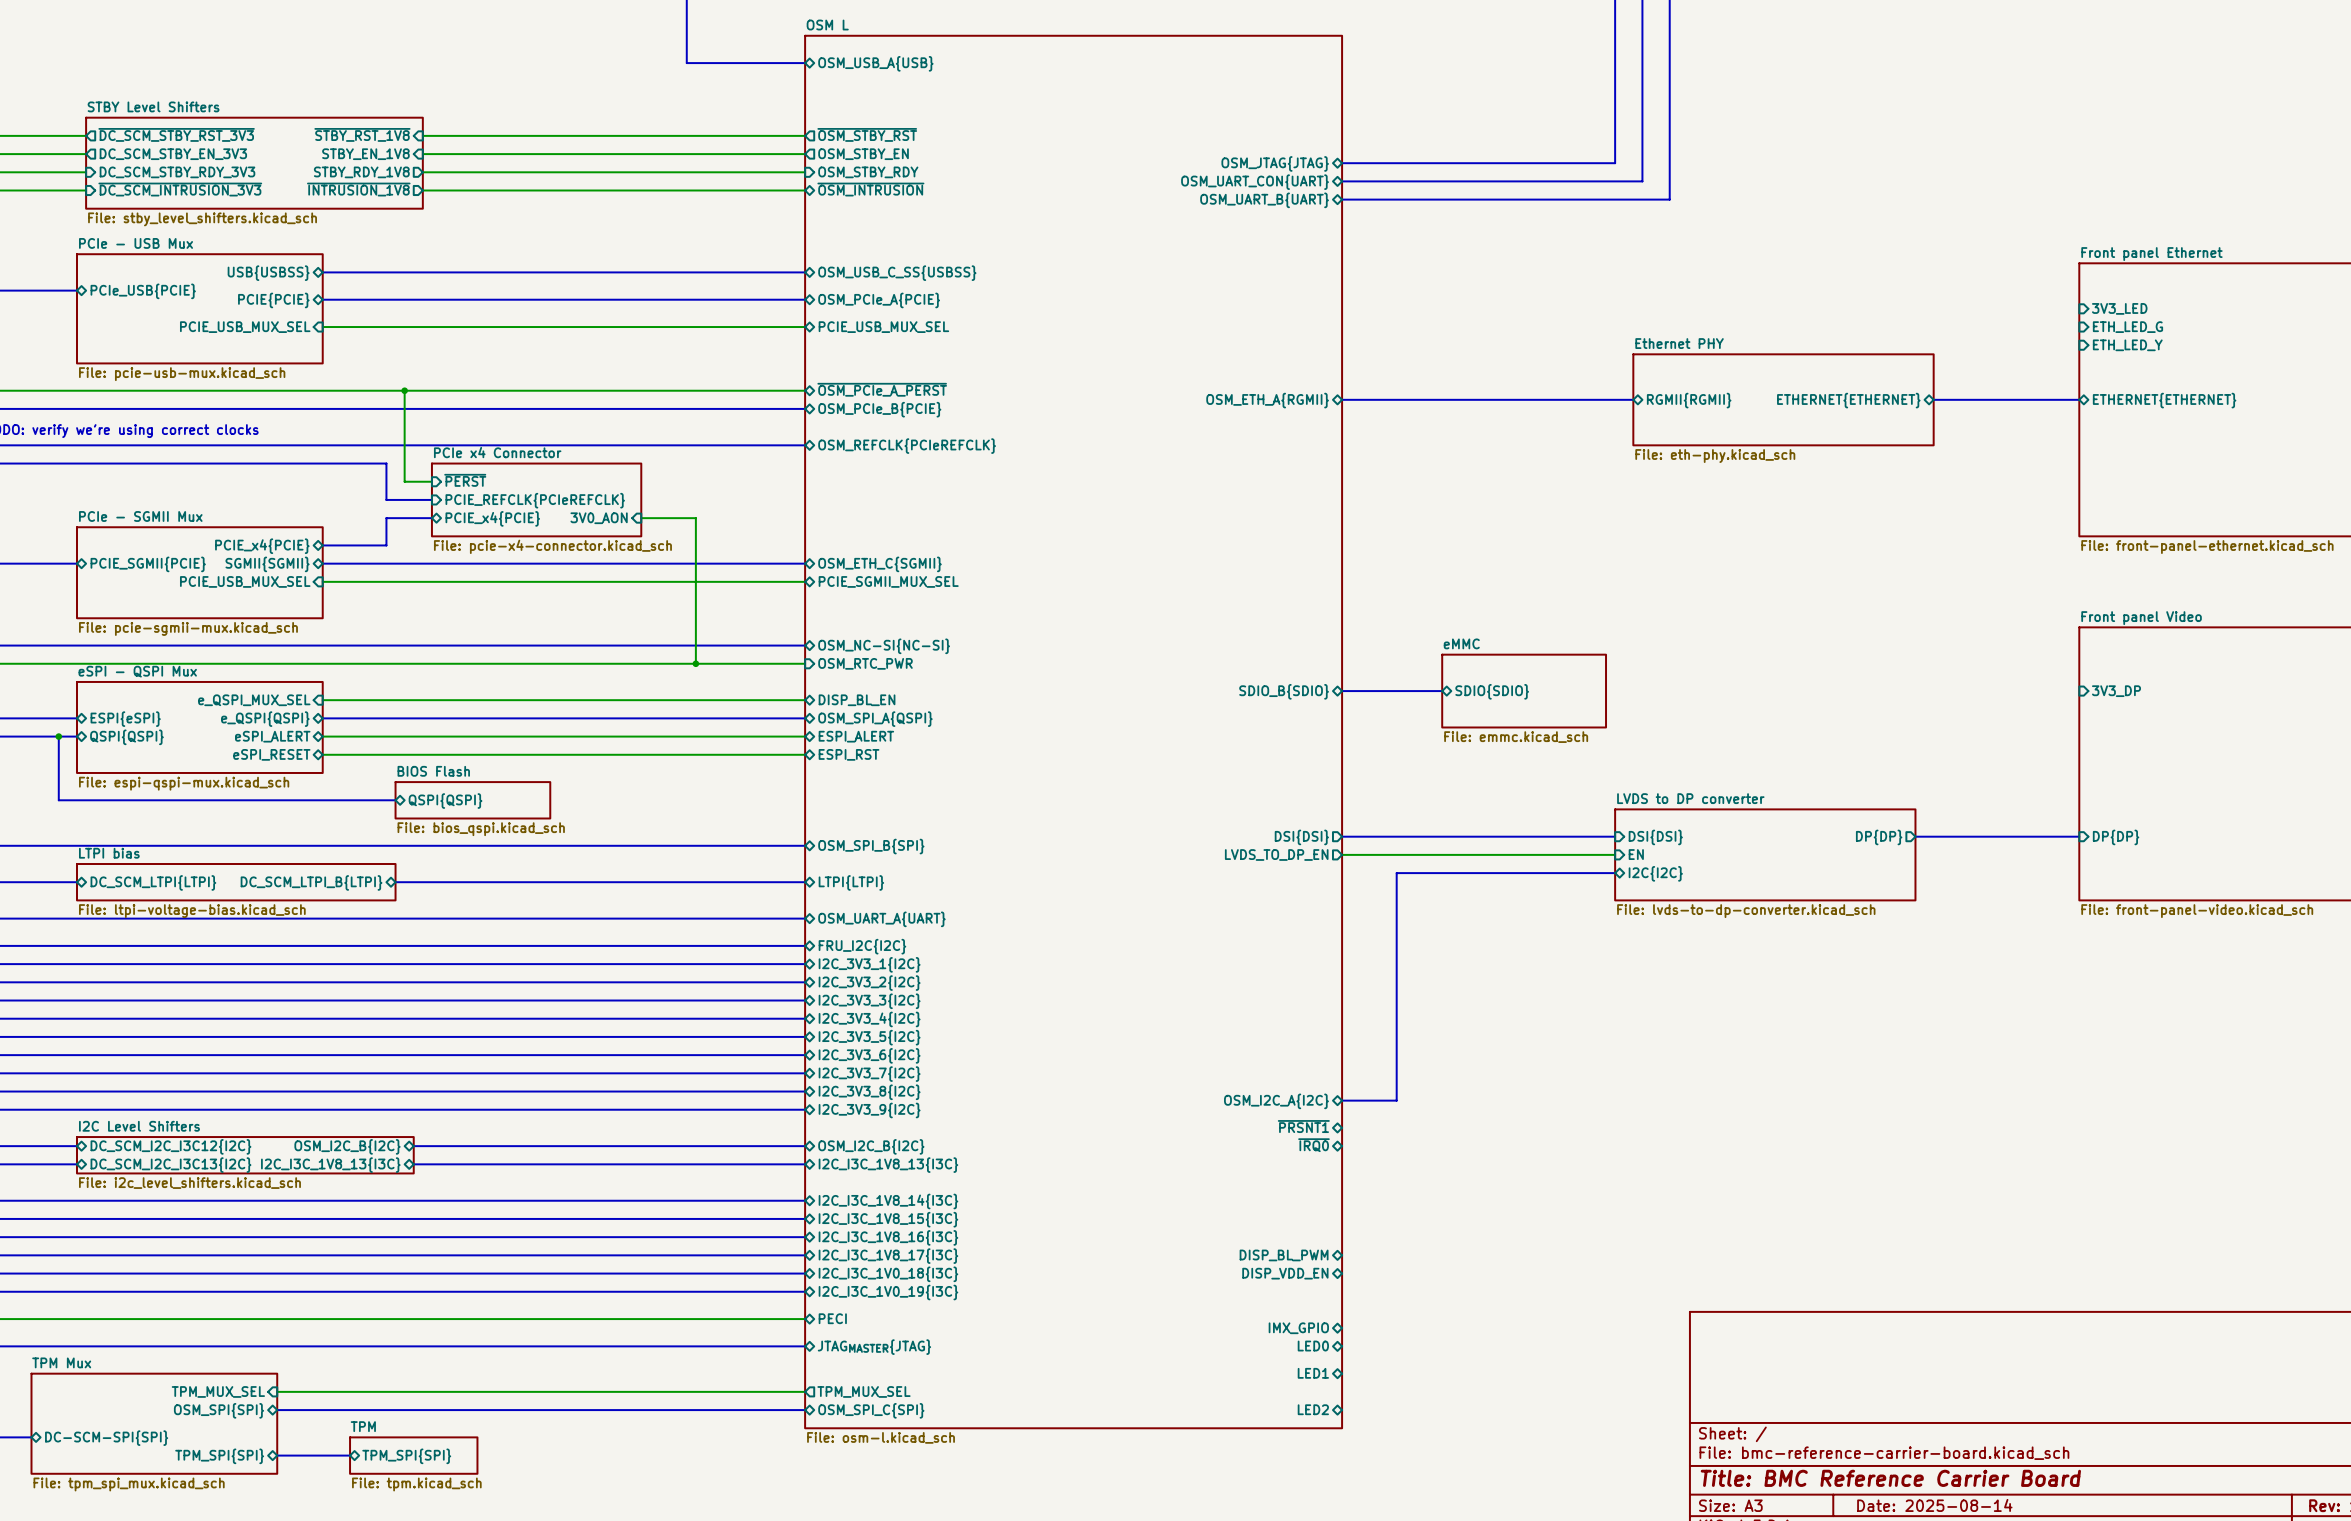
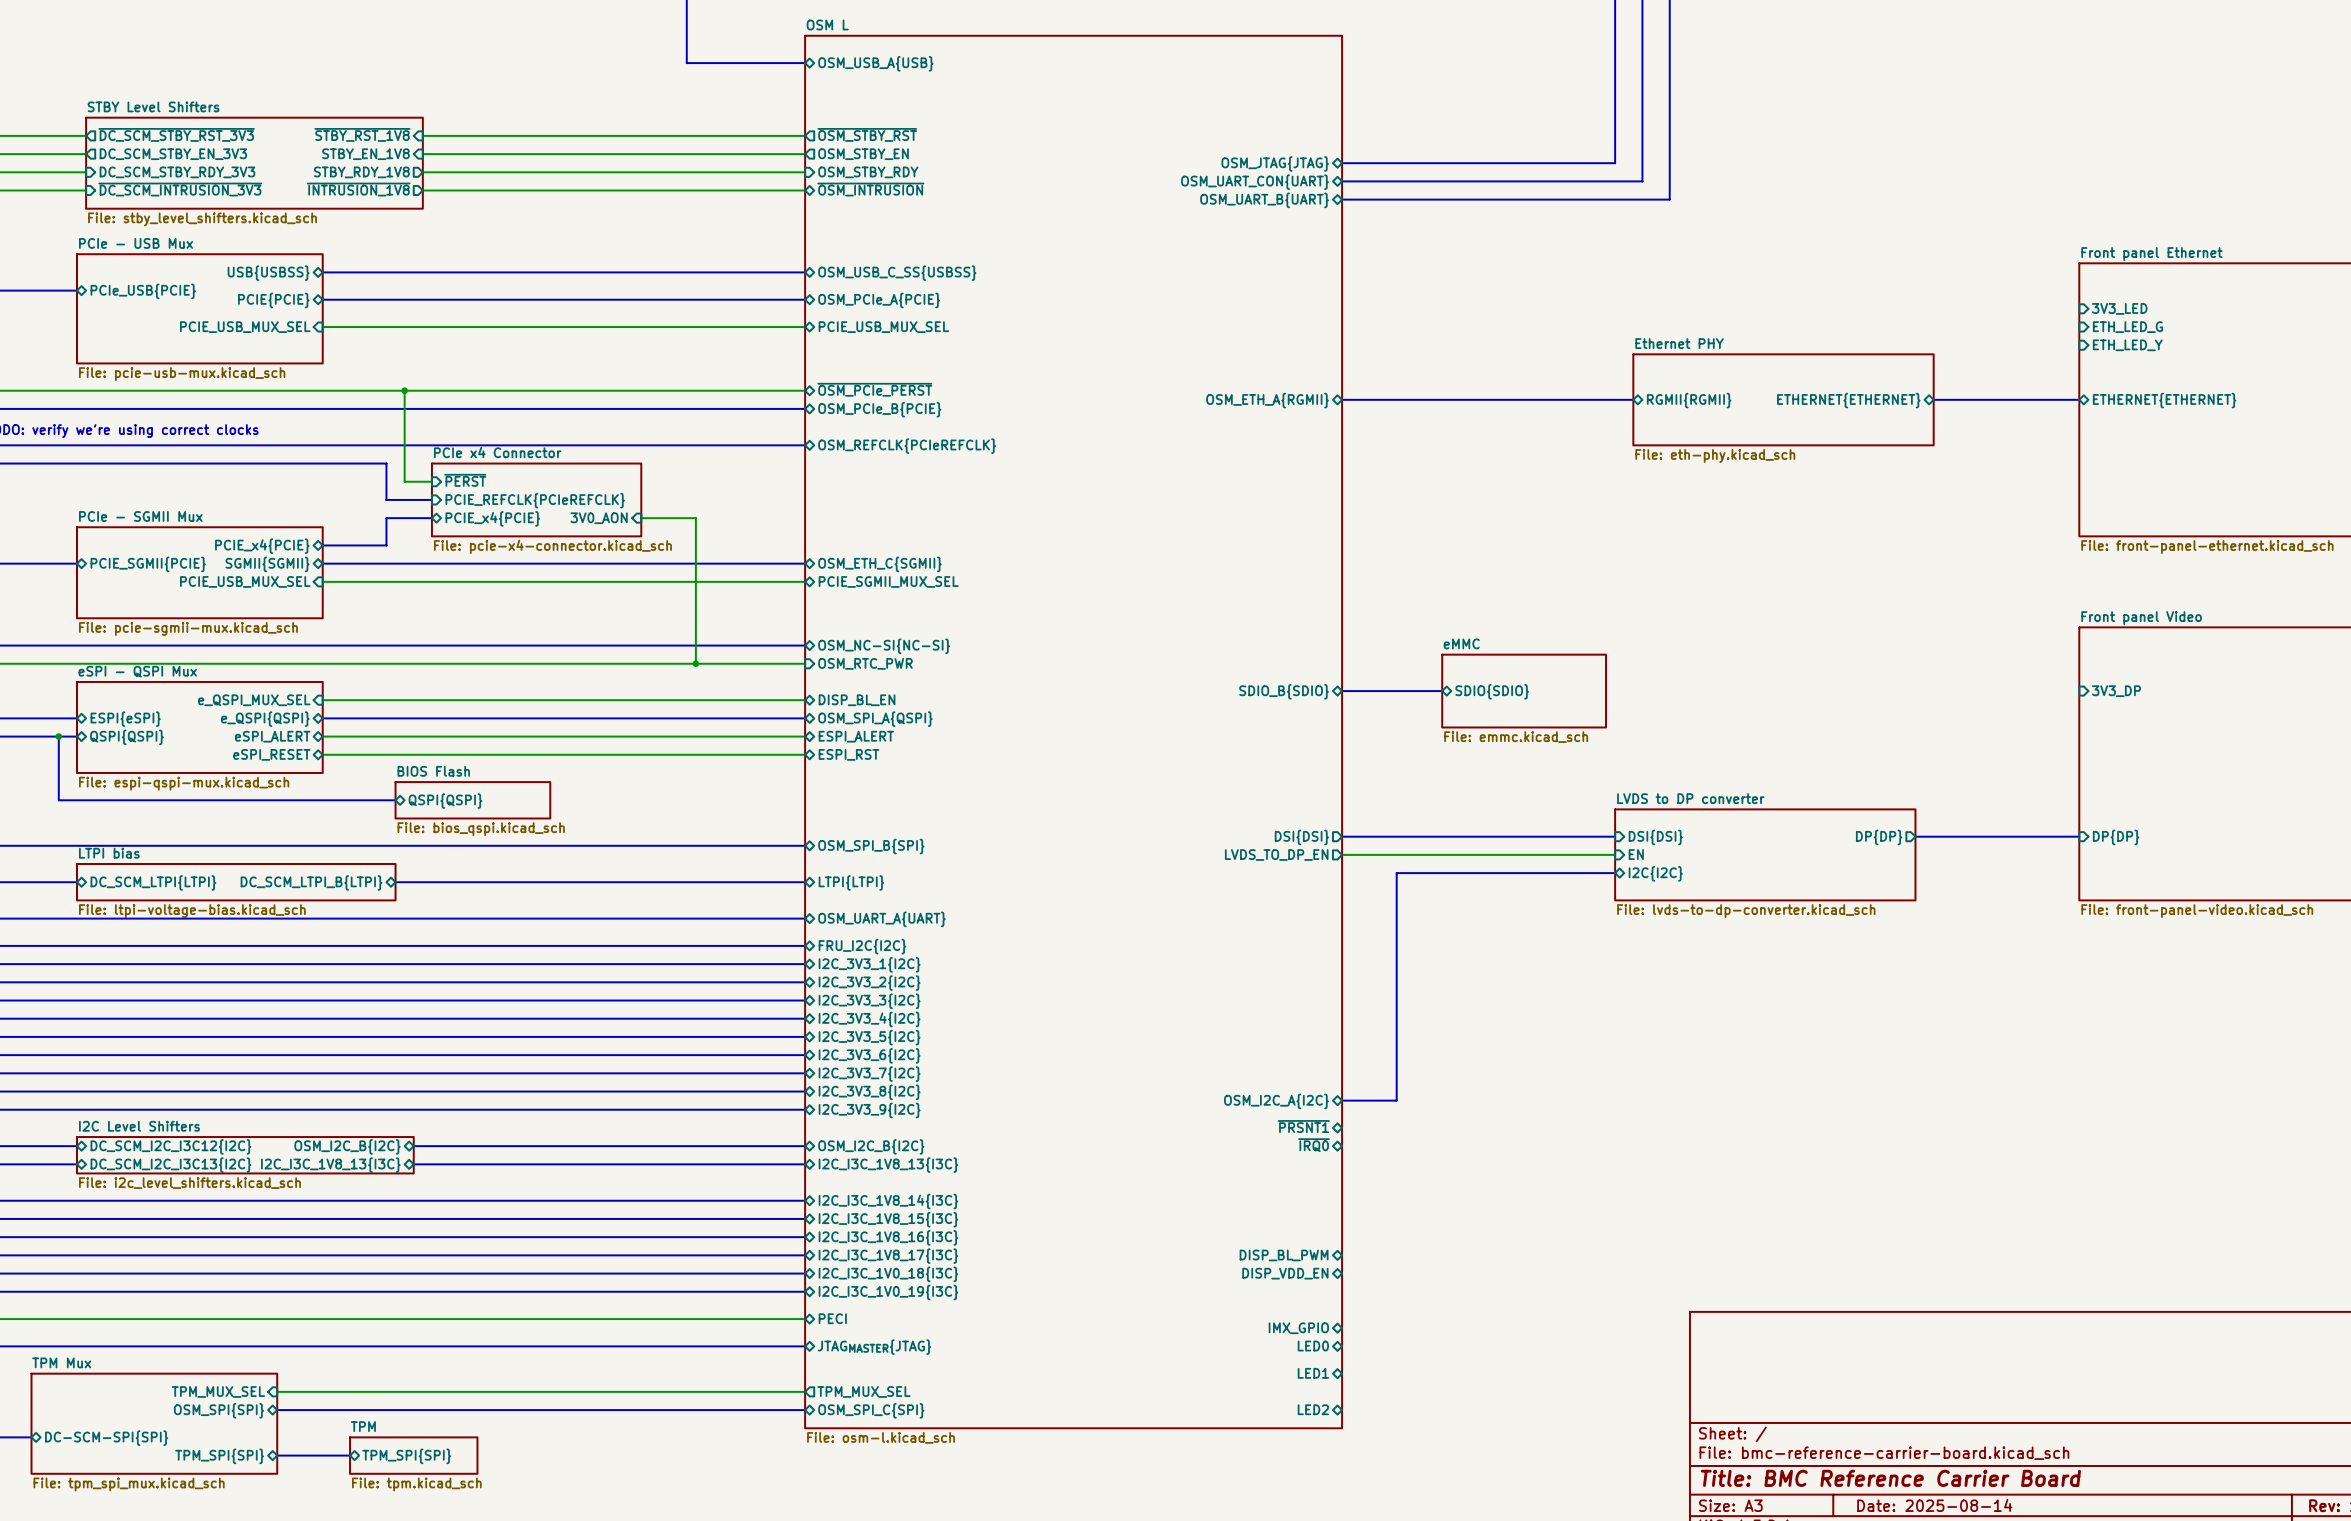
sheet pin: ~{OSM_PCIe_A_PERST} (882, 389) -> ~{OSM_PCIe_PERST} (874, 389)

